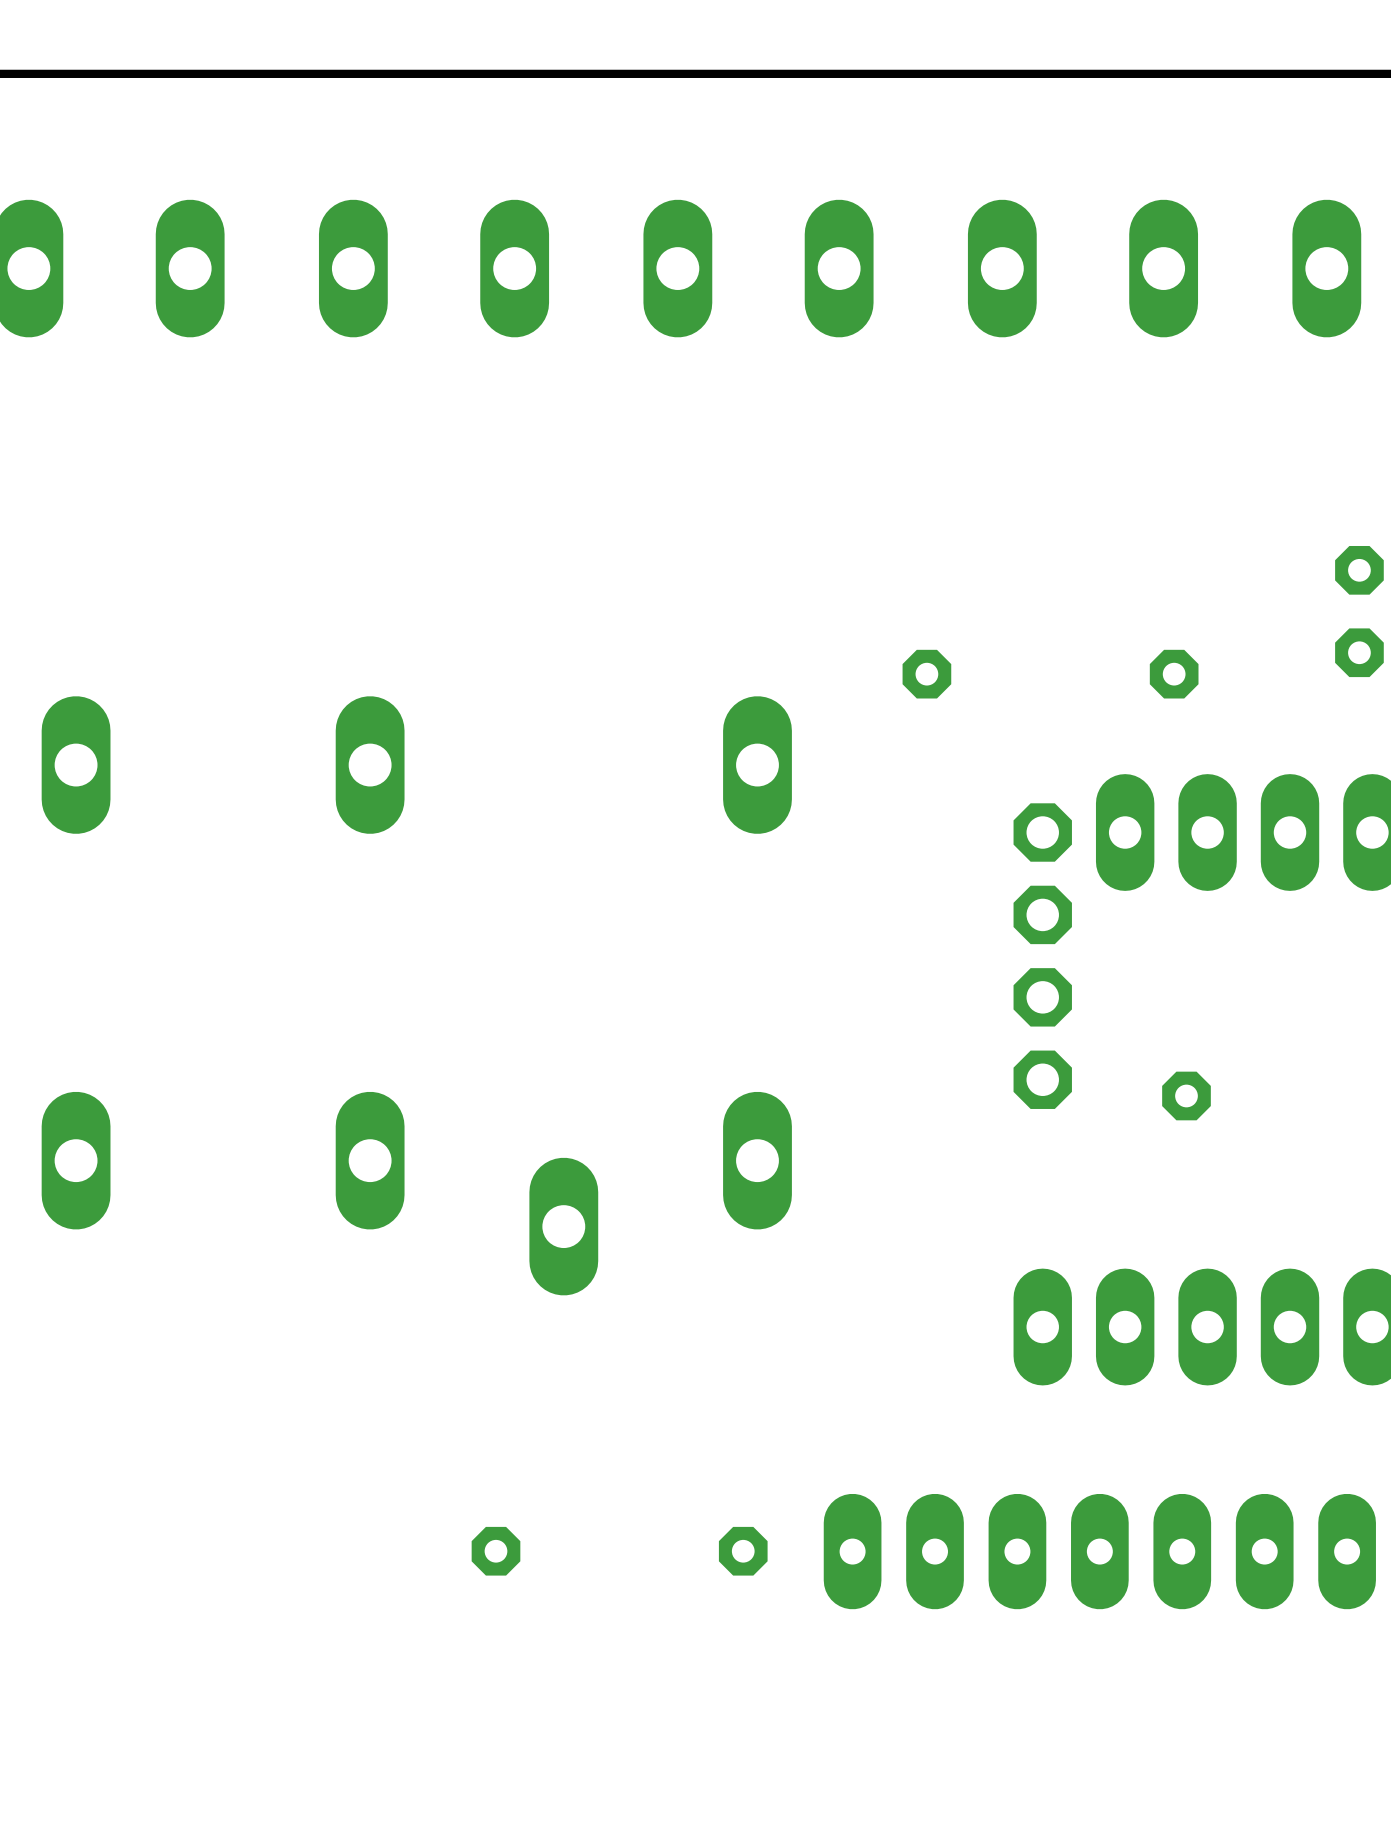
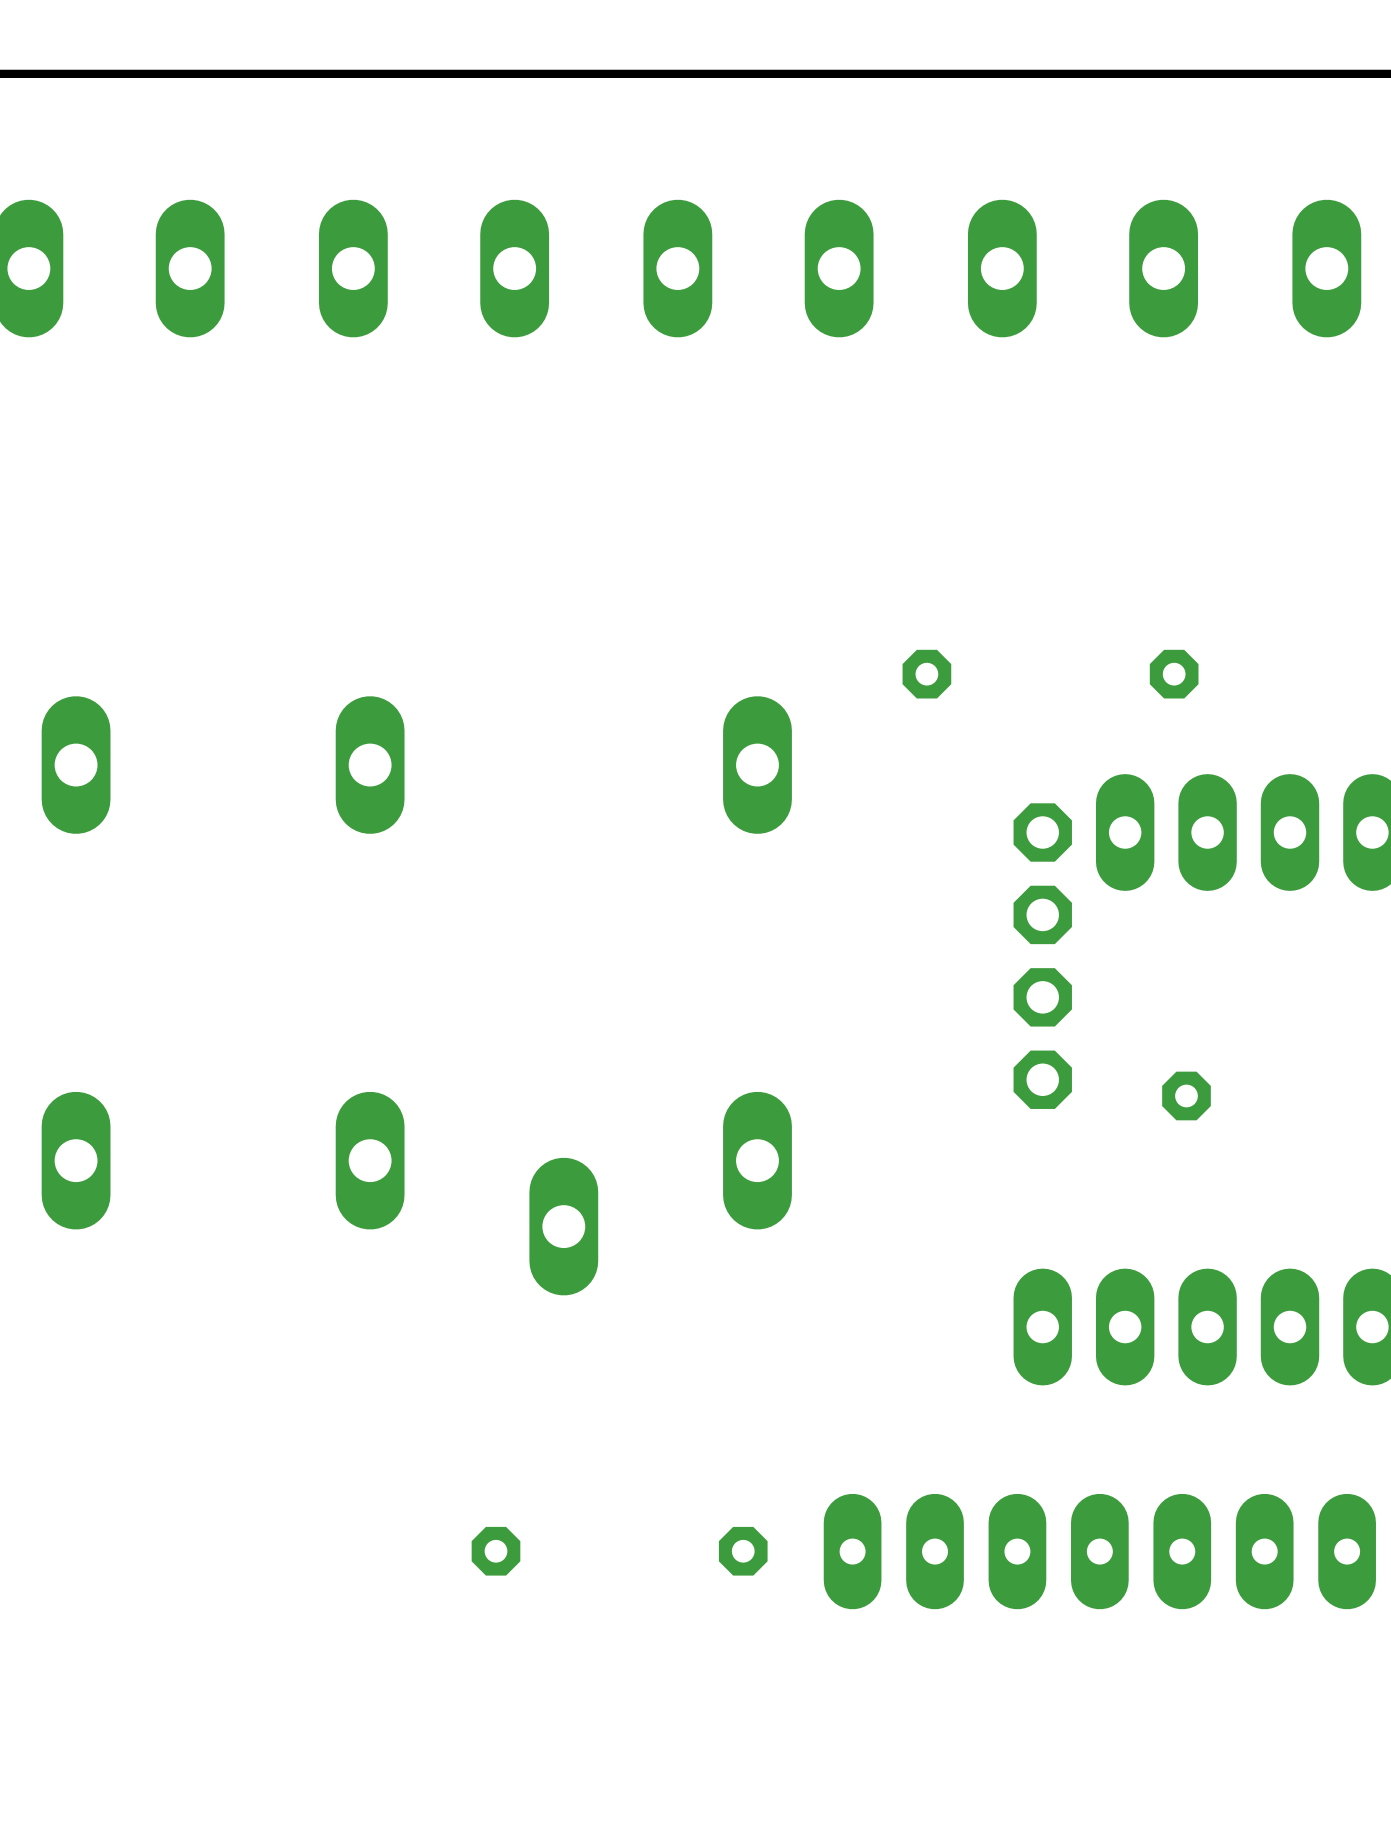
part: (1359, 611) -> none

